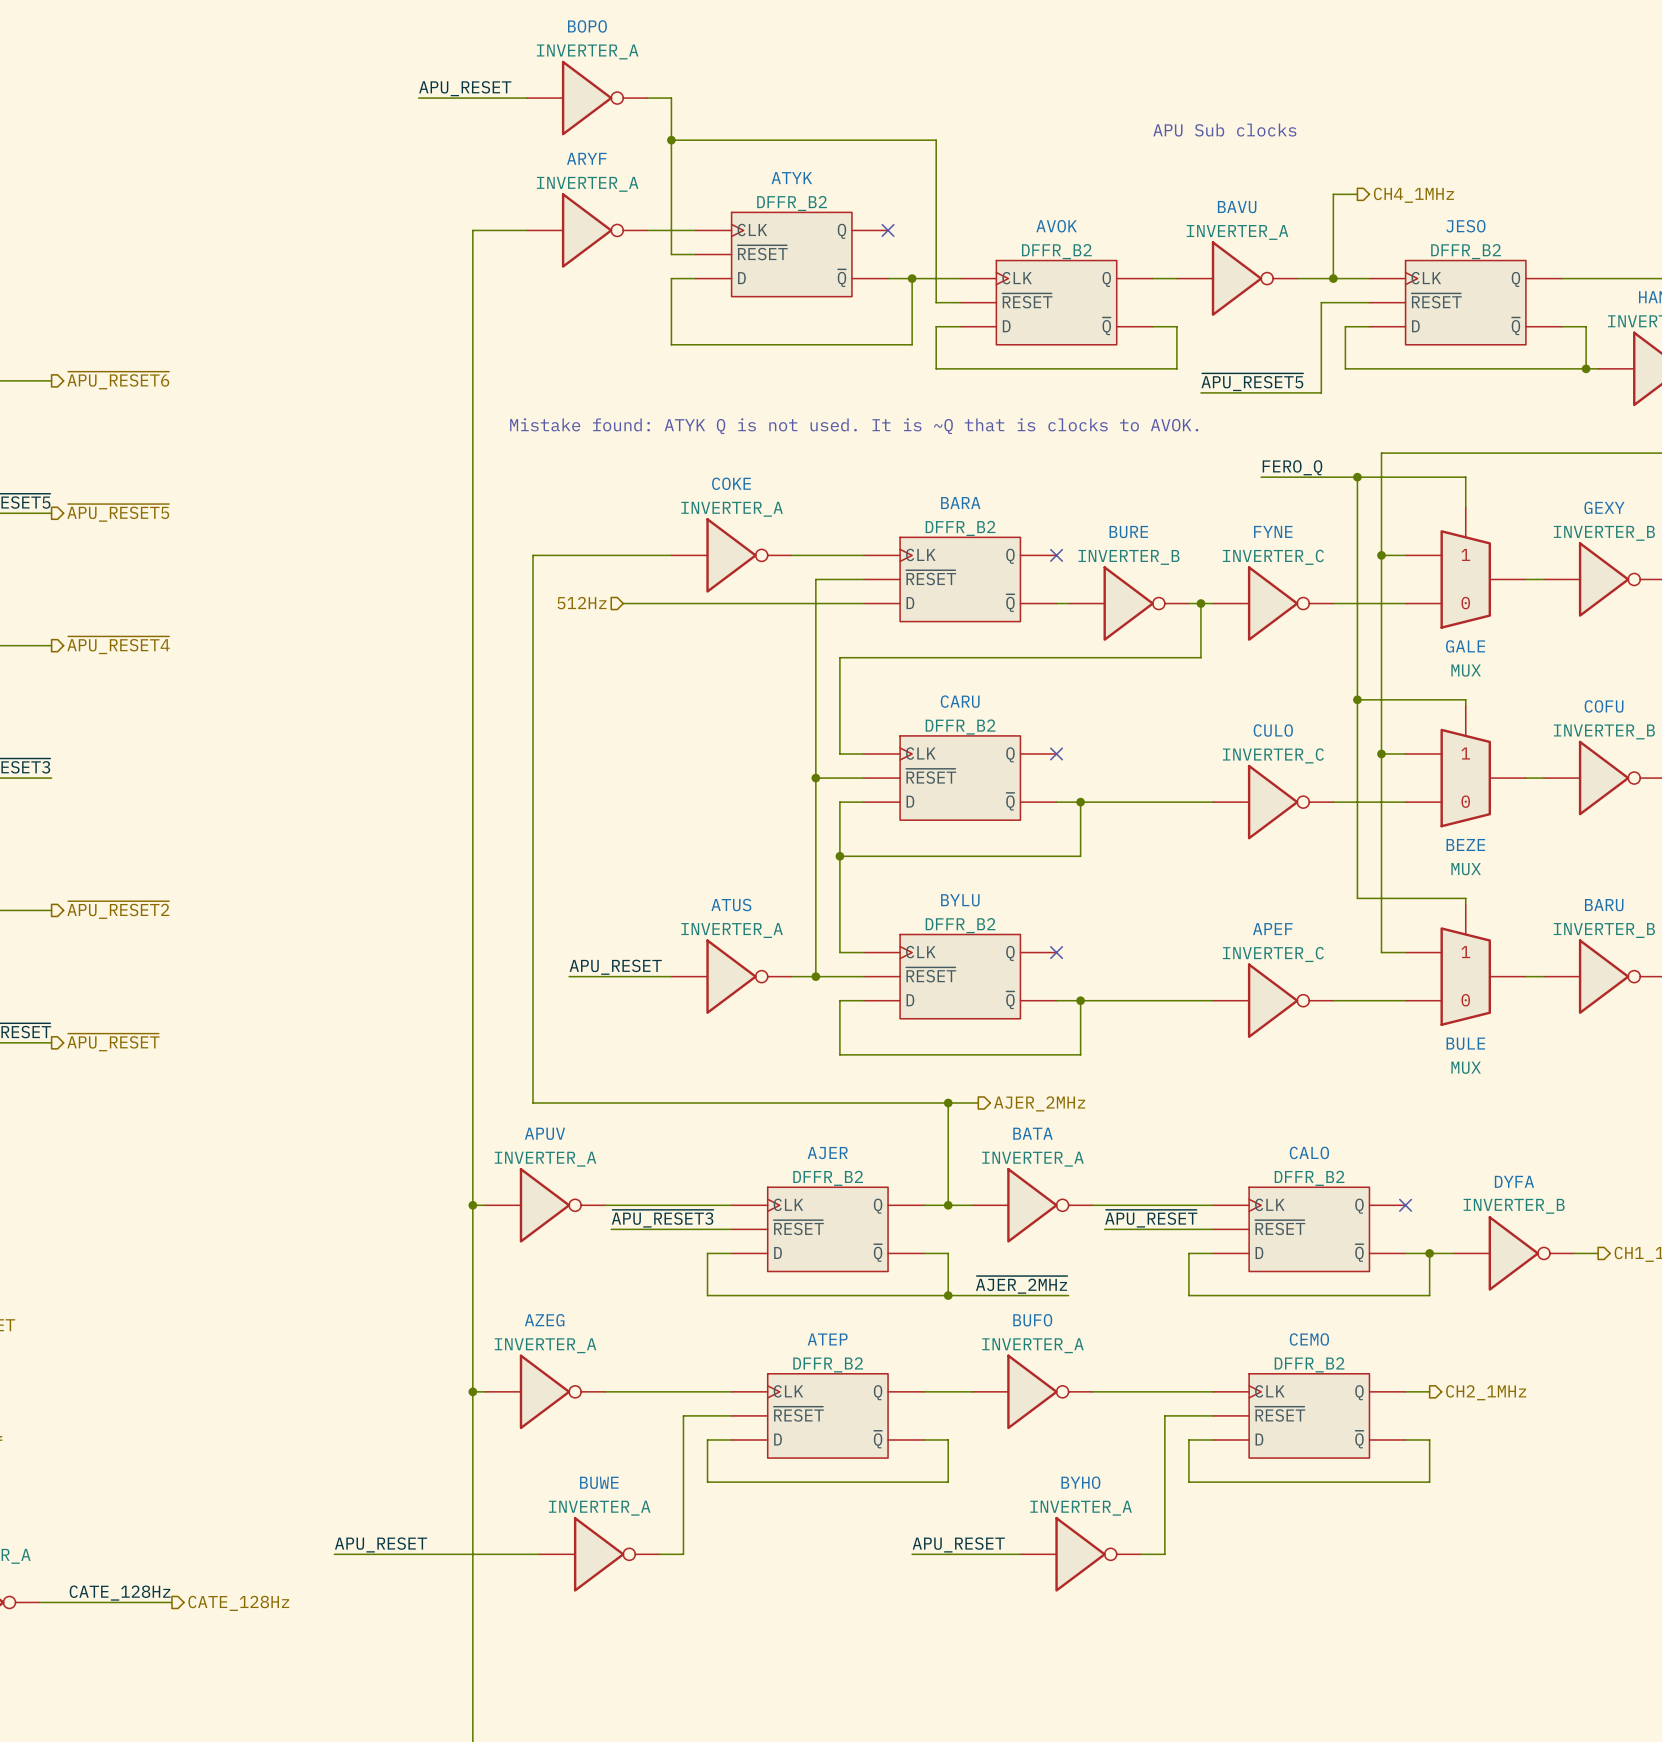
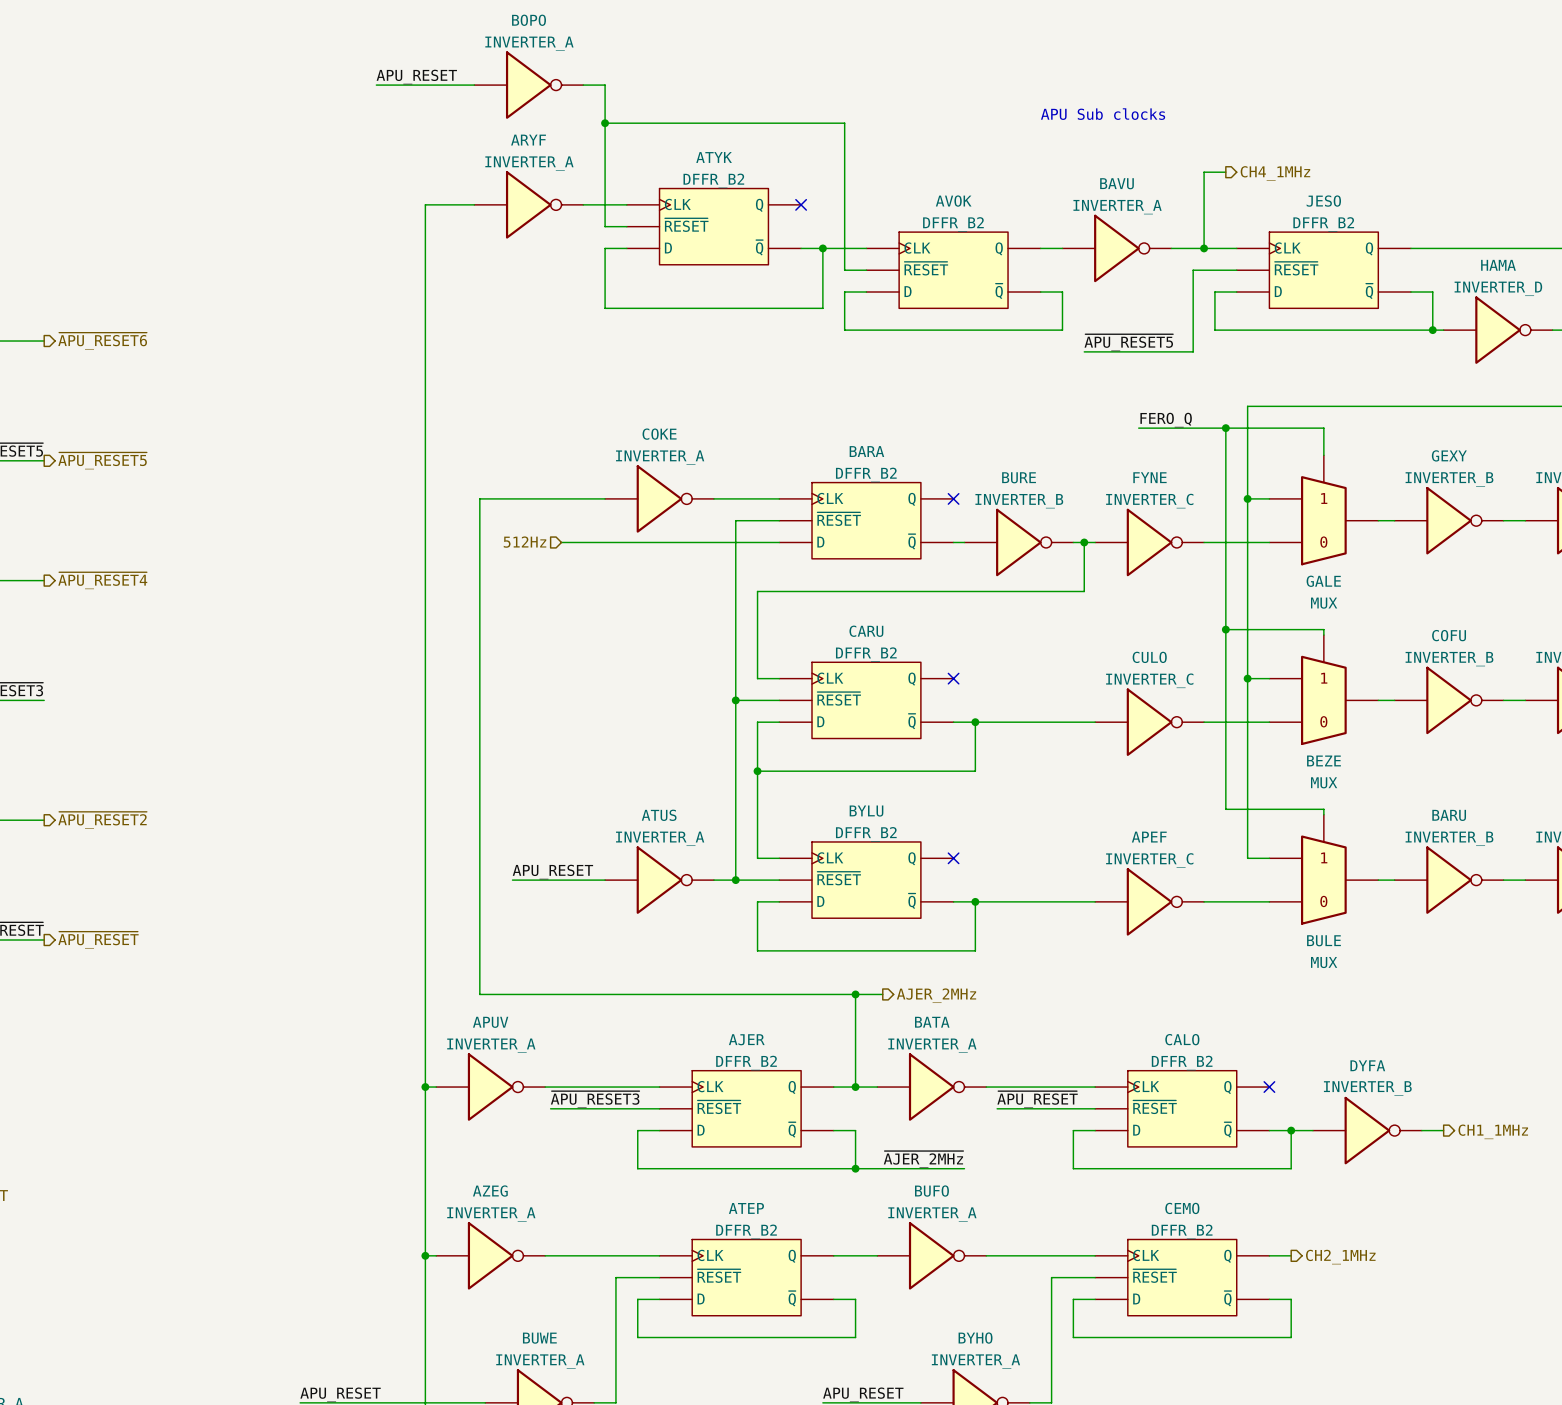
text: Mistake found: ATYK Q is not used. It is ~Q that is clocks to AVOK. (854, 426) -> none

